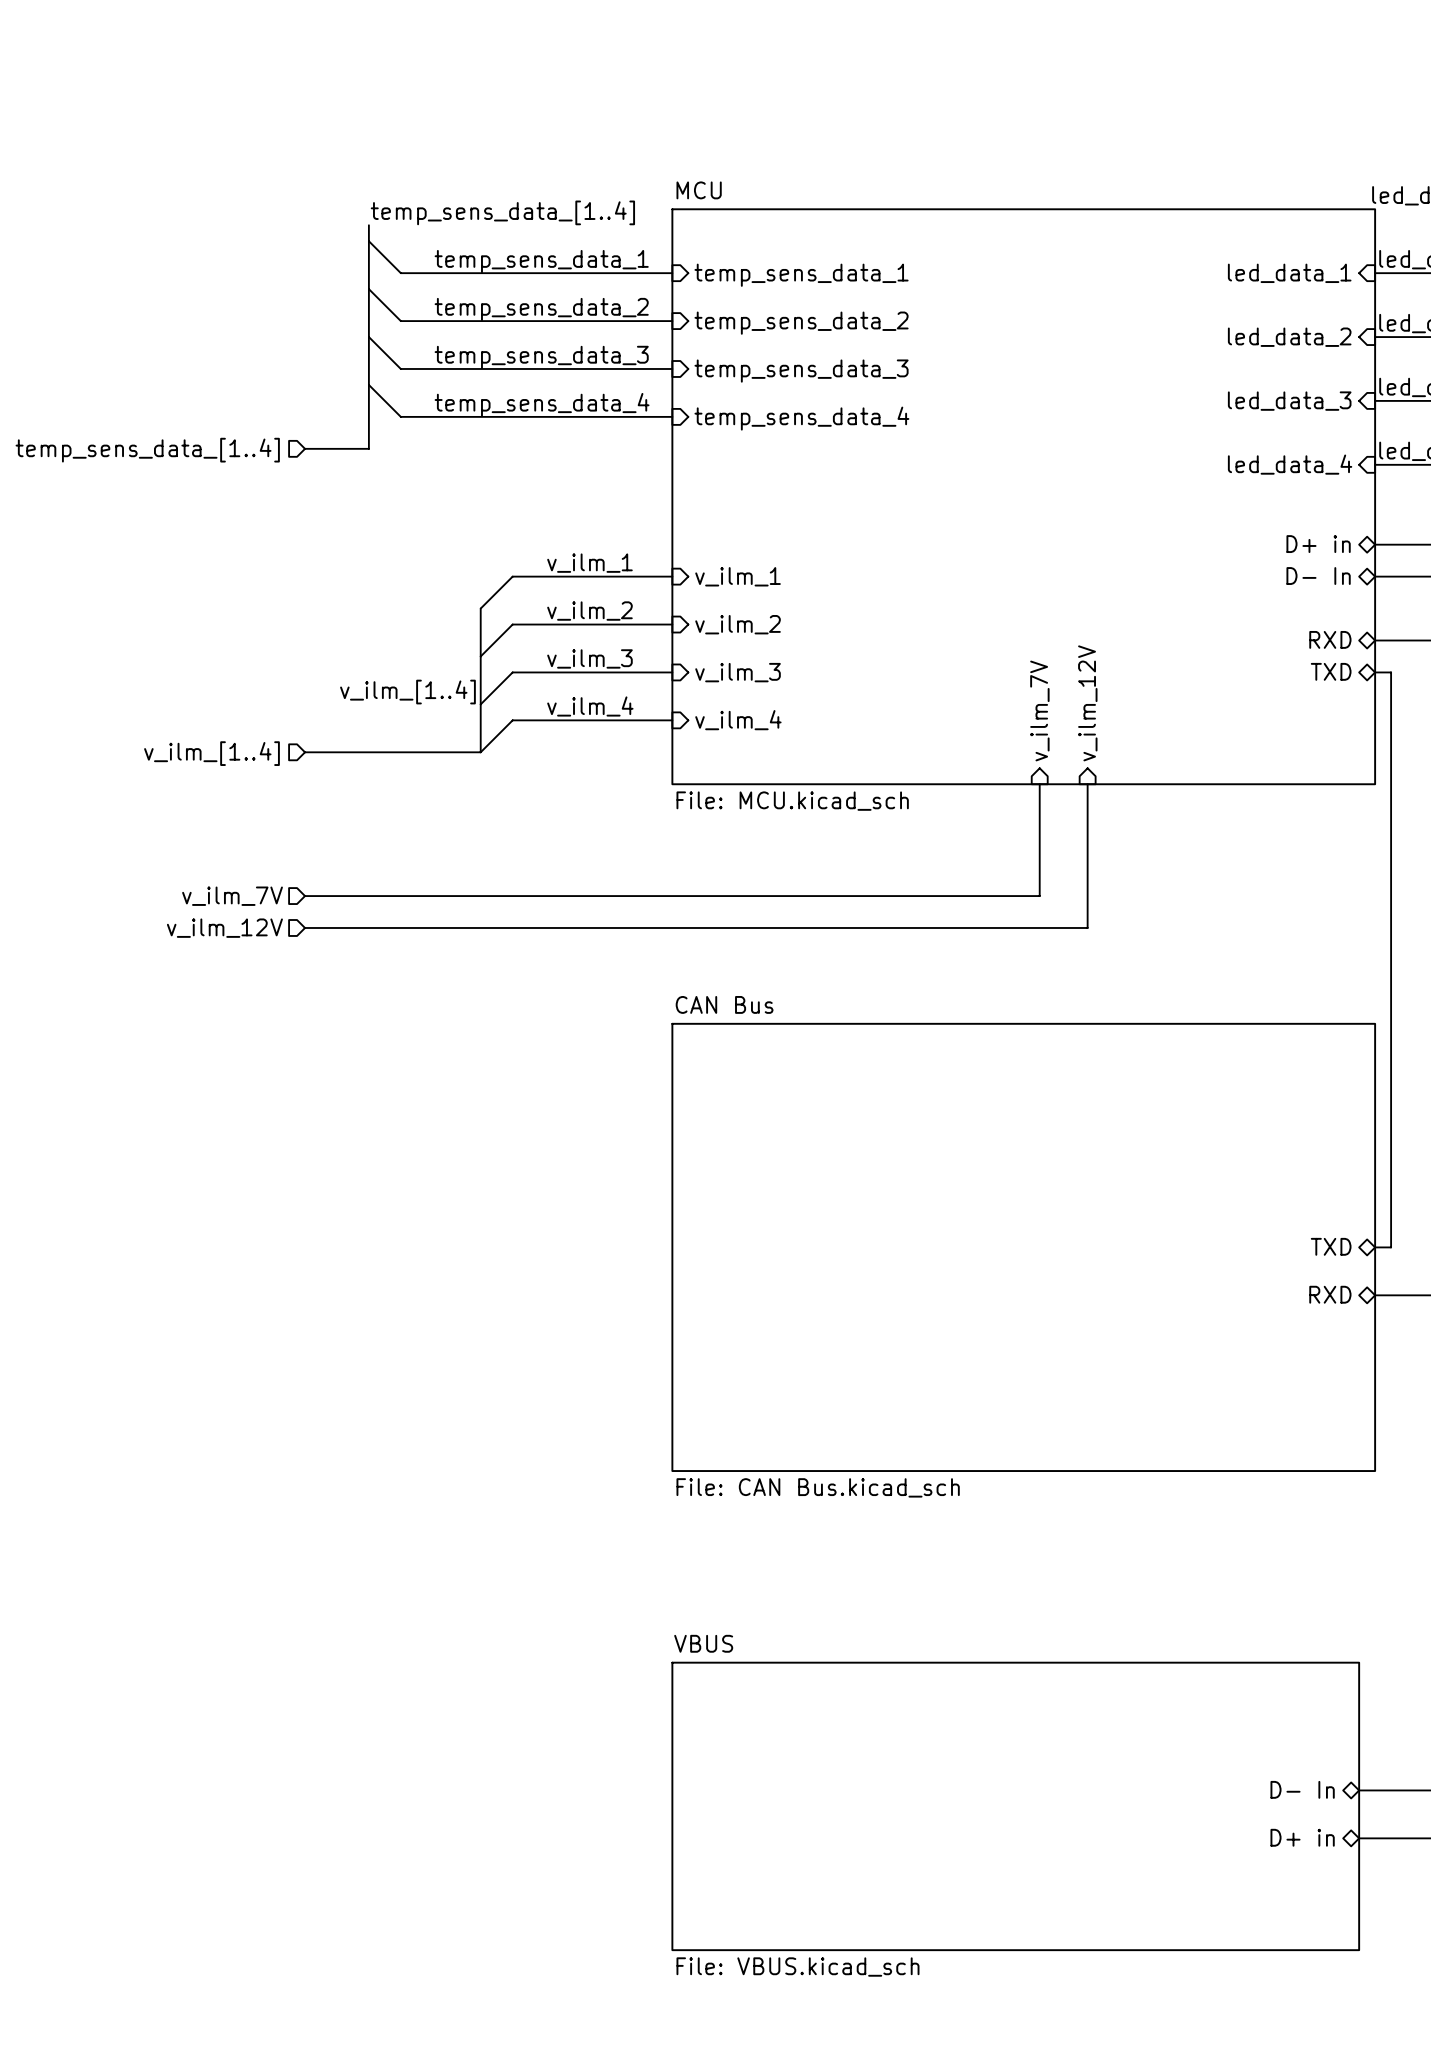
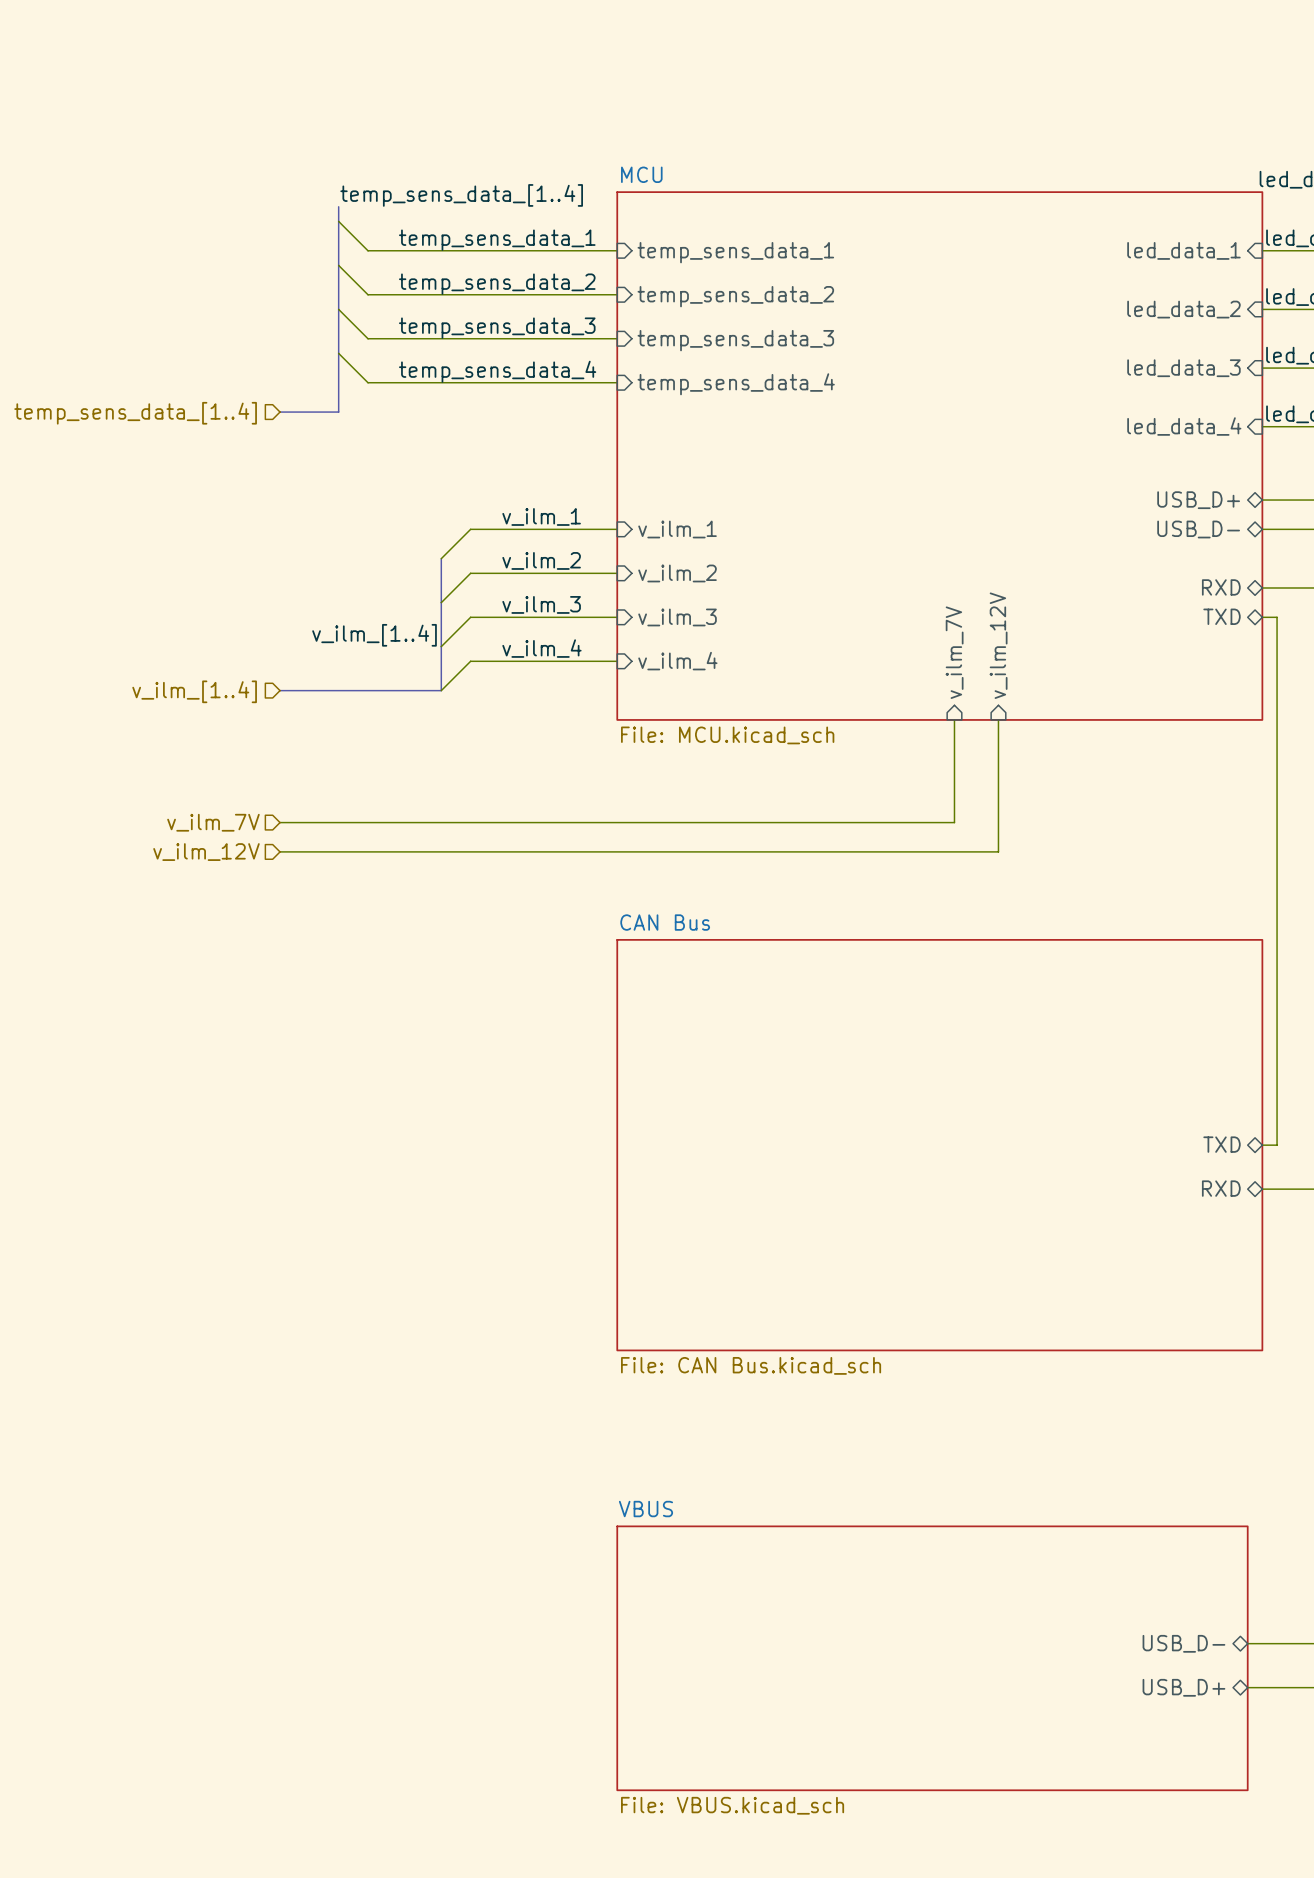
sheet pin: D+ in (1318, 544) -> USB_D+ (1198, 500)
sheet pin: D- In (1318, 576) -> USB_D- (1198, 529)
sheet pin: D- In (1302, 1789) -> USB_D- (1183, 1643)
sheet pin: D+ in (1302, 1837) -> USB_D+ (1183, 1687)

